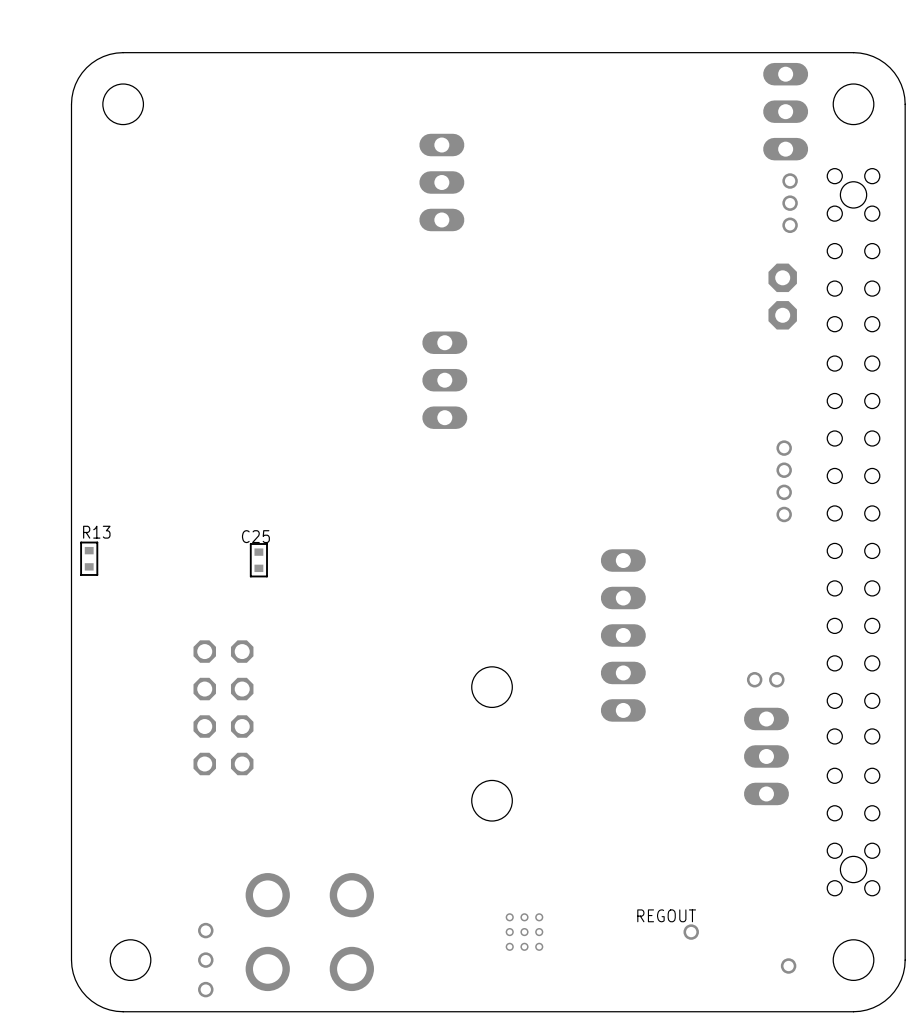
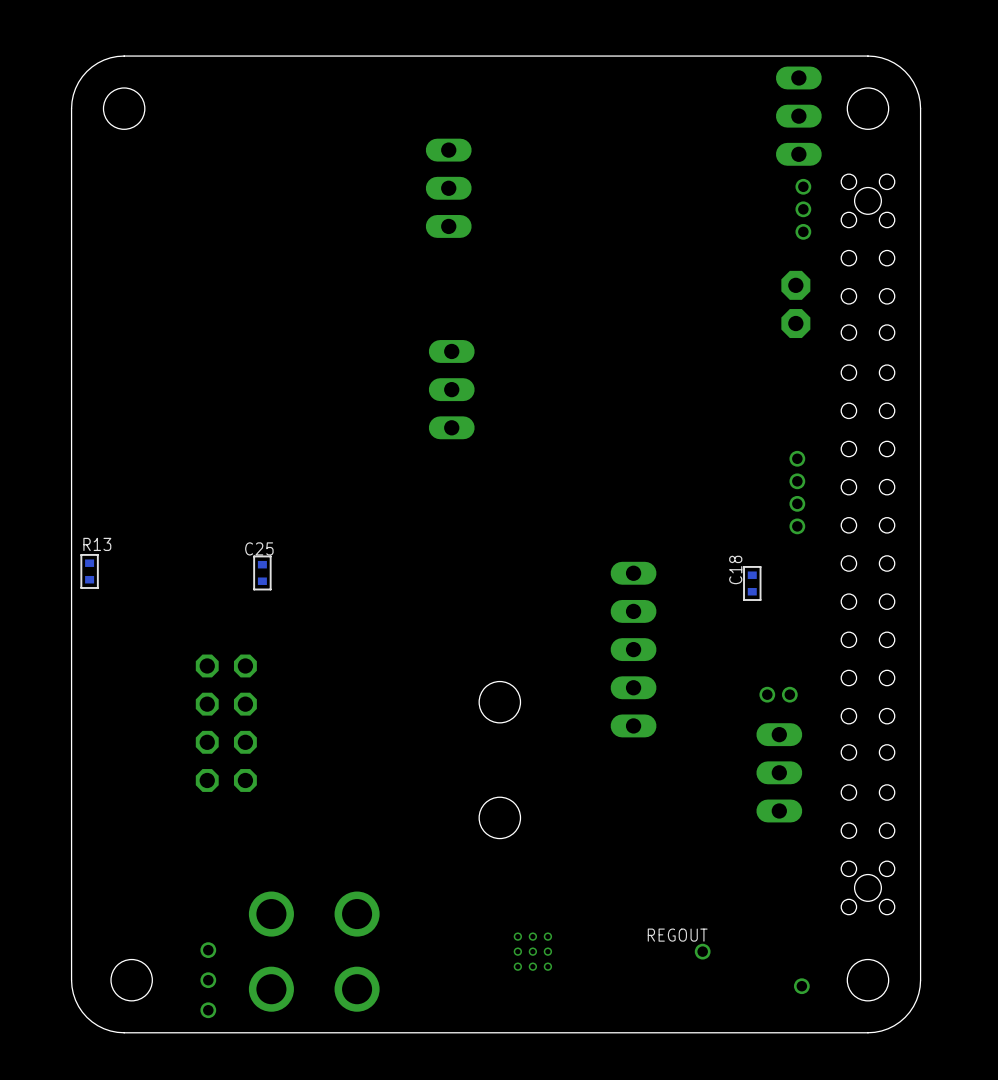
C18: none -> (752, 583)

